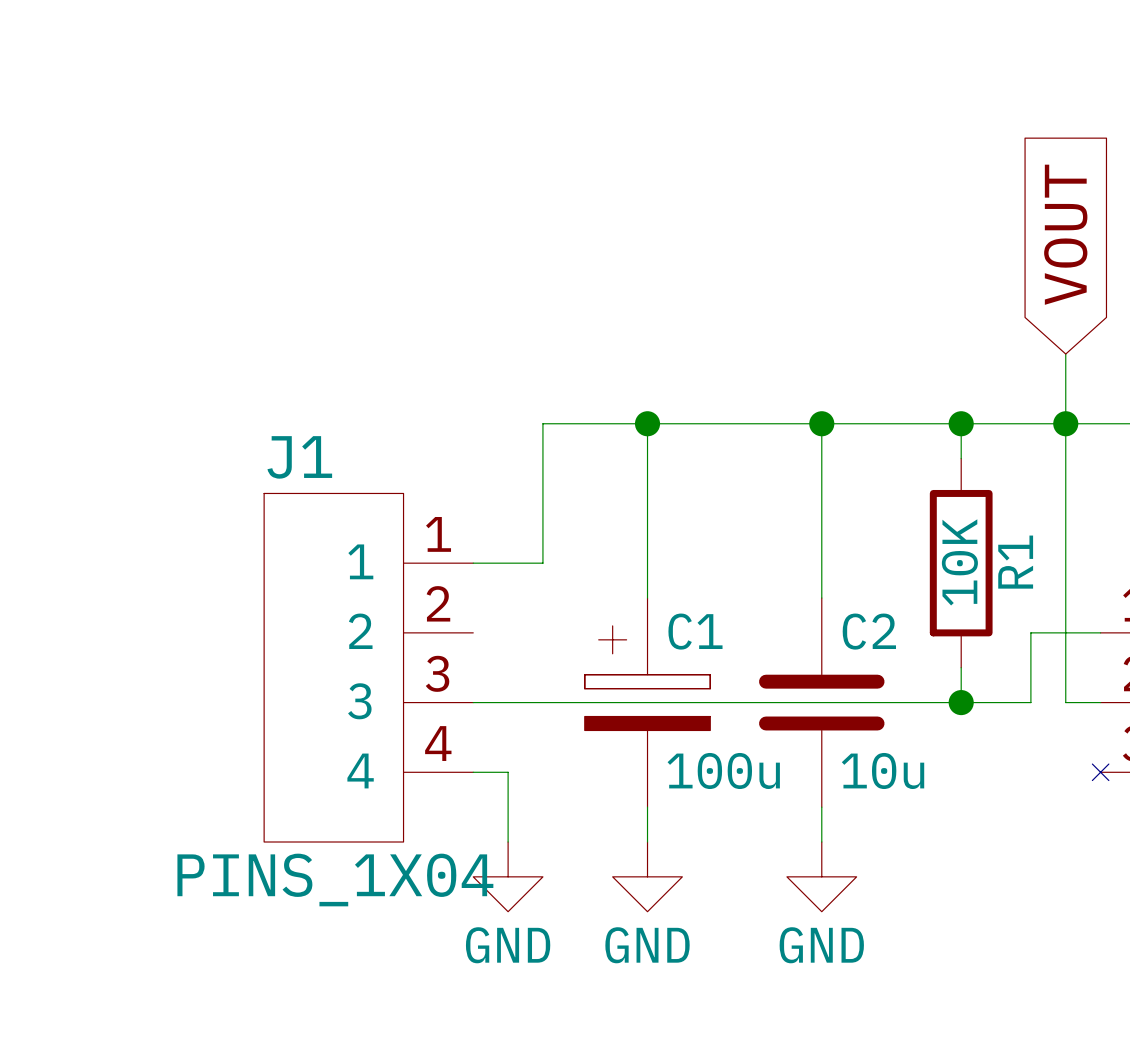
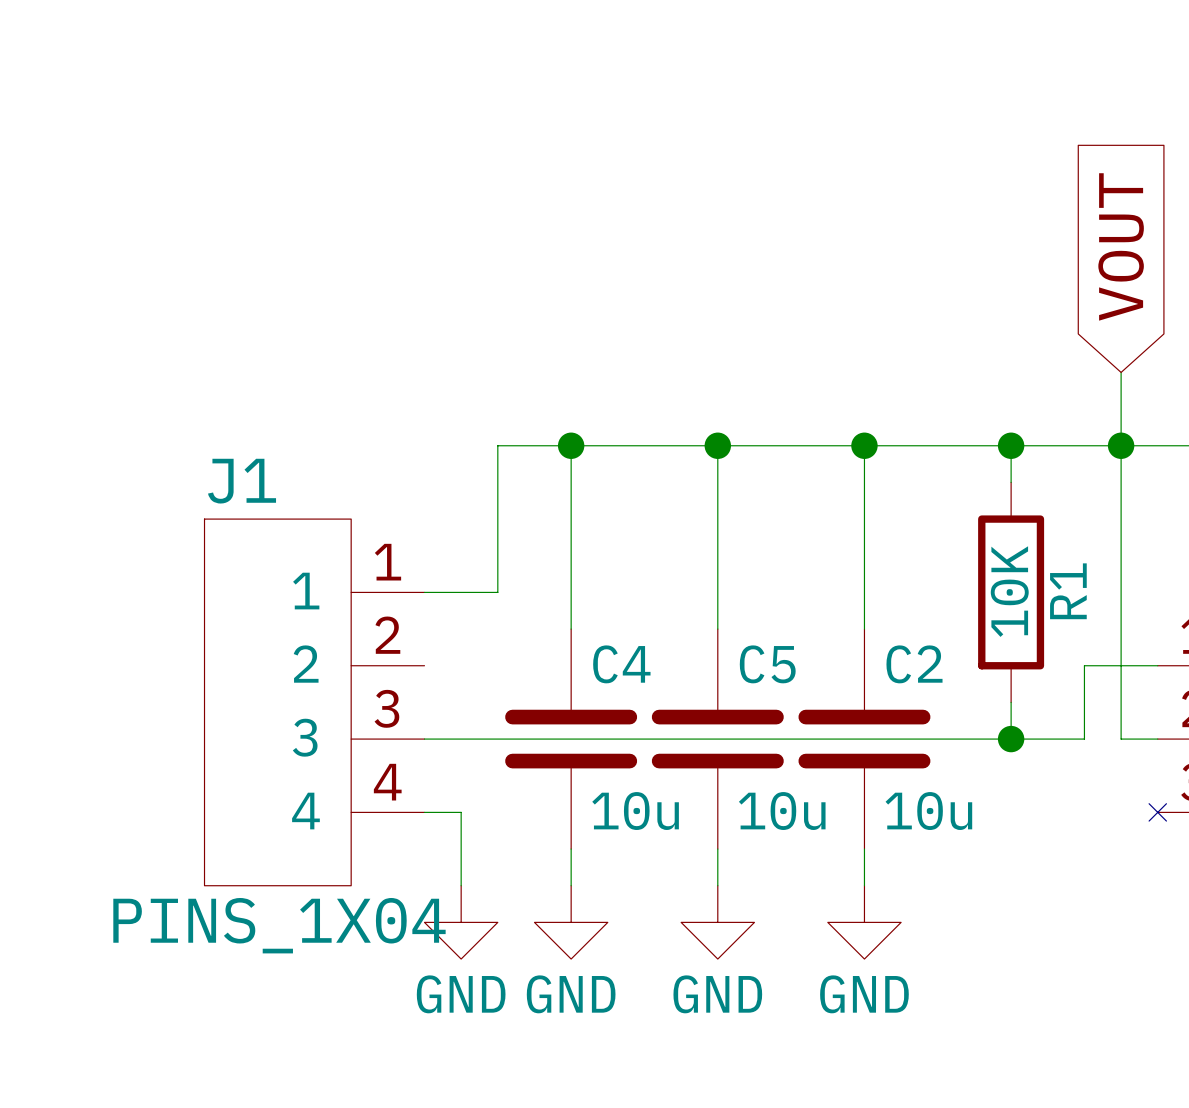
wire: none -> (571, 445) (497, 445) (497, 592) (424, 592)
junction: none -> (571, 445)
wire: (647, 423) (647, 598) -> (717, 445) (717, 629)
junction position: (647, 423) -> (717, 445)
wire: (473, 563) (542, 563) -> (571, 629) (571, 592)
J1 position: (368, 667) -> (314, 702)
C4: none -> 10u (571, 739)
C1: 100u (647, 702) -> none
C5: none -> 10u (717, 739)
wire: (473, 772) (508, 772) (508, 842) -> (424, 812) (461, 812) (461, 885)
wire: none -> (571, 849) (571, 885)
wire: (647, 807) (647, 842) -> (717, 849) (717, 885)
power symbol: none -> GND (461, 922)
power symbol: GND (508, 876) -> none
power symbol: none -> GND (571, 922)
power symbol position: GND (647, 876) -> GND (717, 922)

